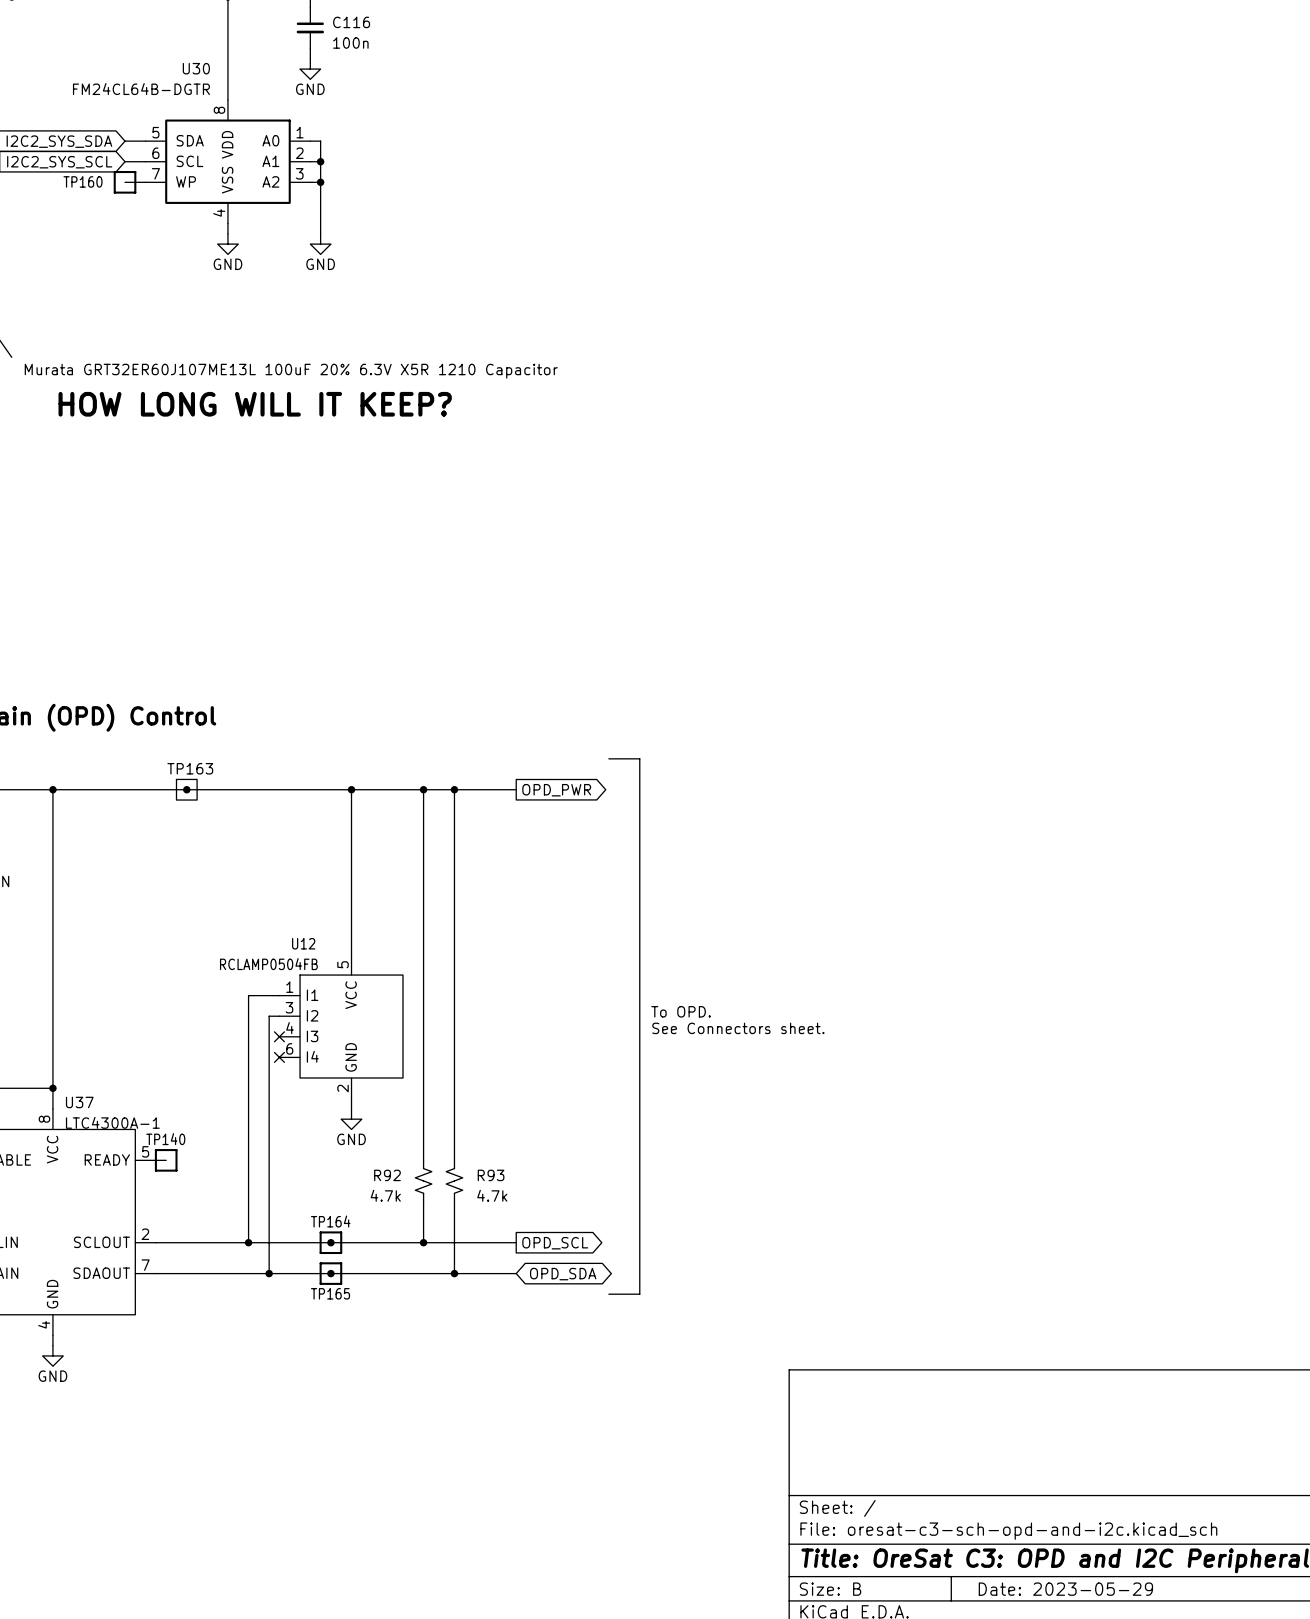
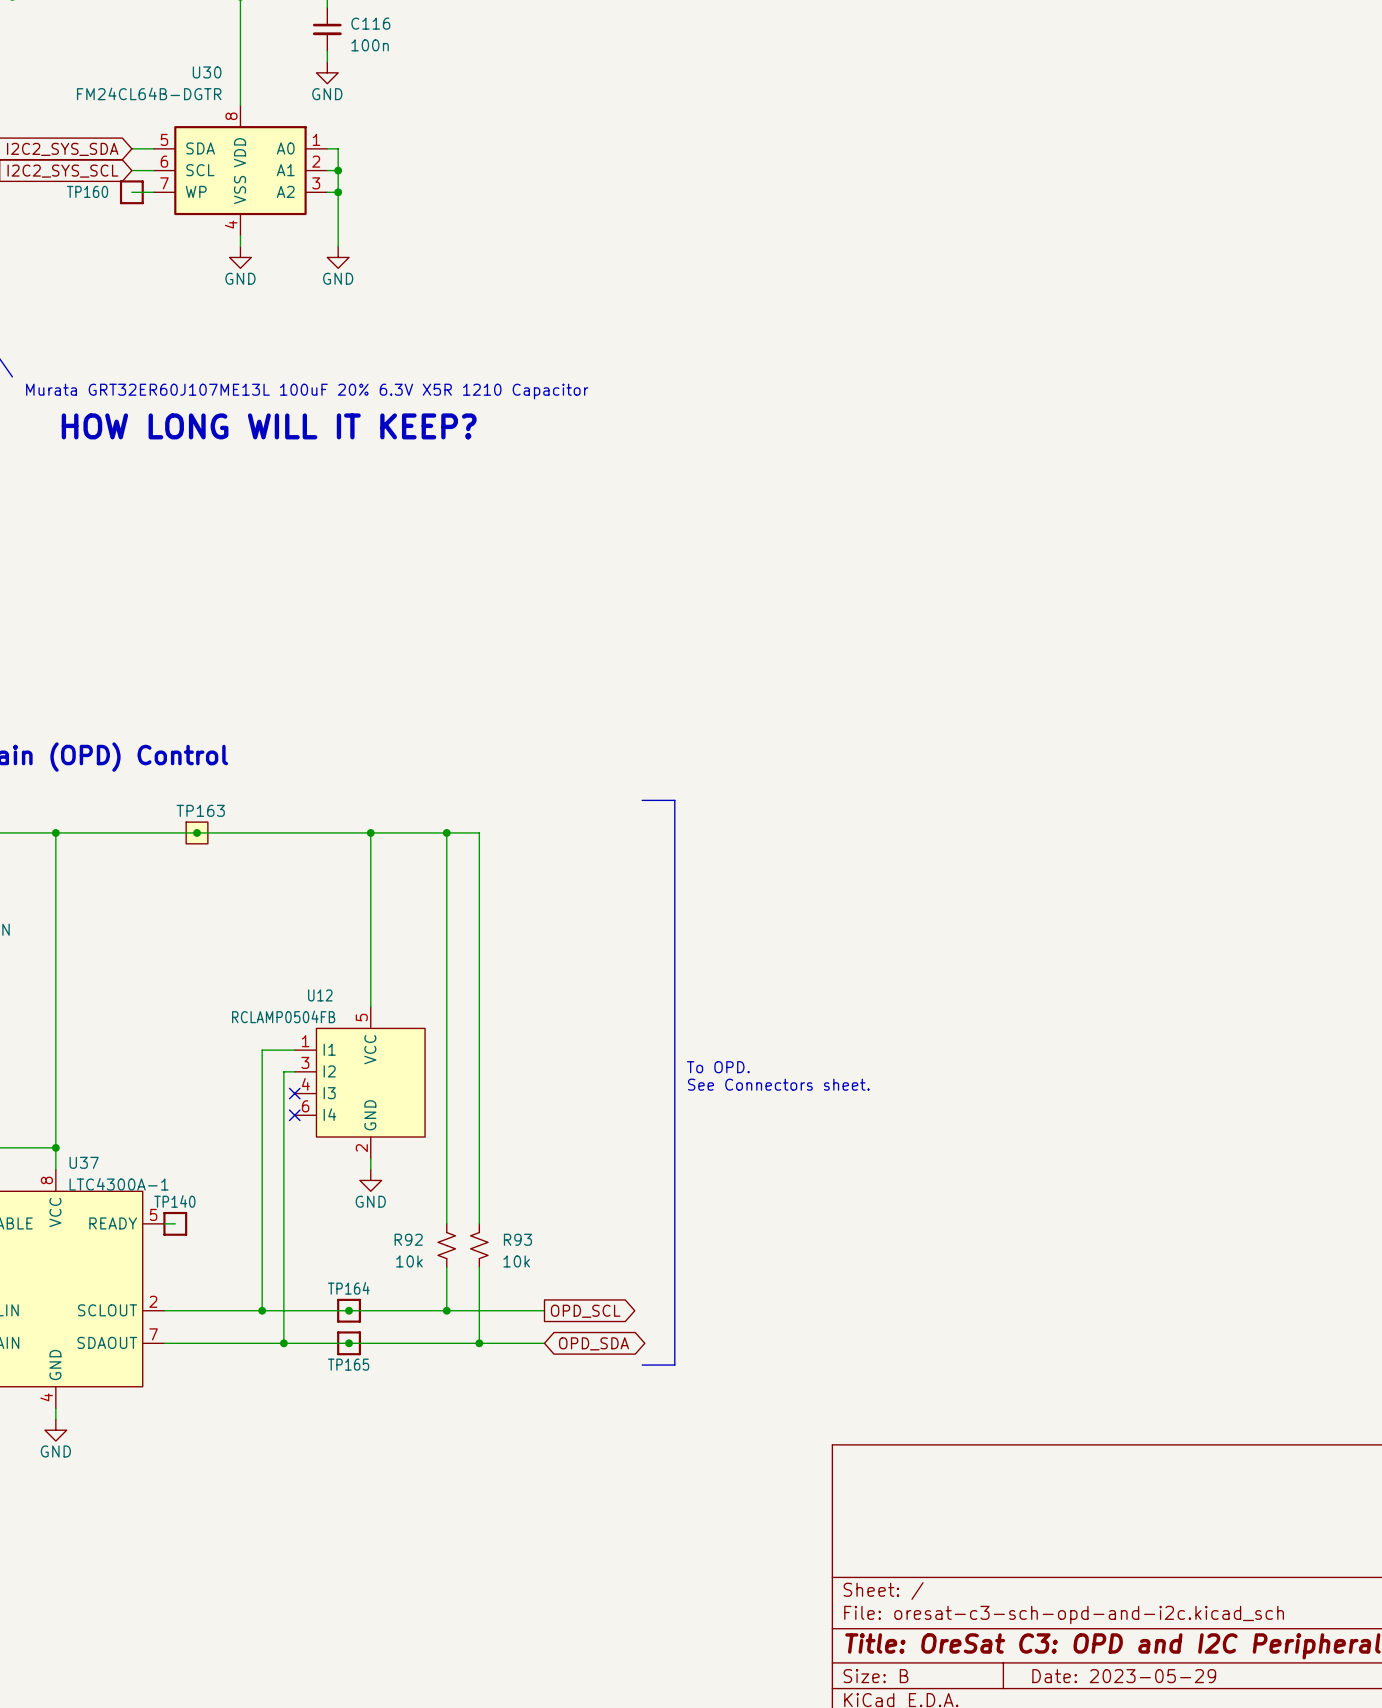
wire: (454, 789) (516, 789) -> none
junction: (454, 789) -> none
global label: OPD_PWR (556, 790) -> none
R92 value: 4.7k (385, 1195) -> 10k (409, 1261)
R93 value: 4.7k (492, 1195) -> 10k (516, 1261)

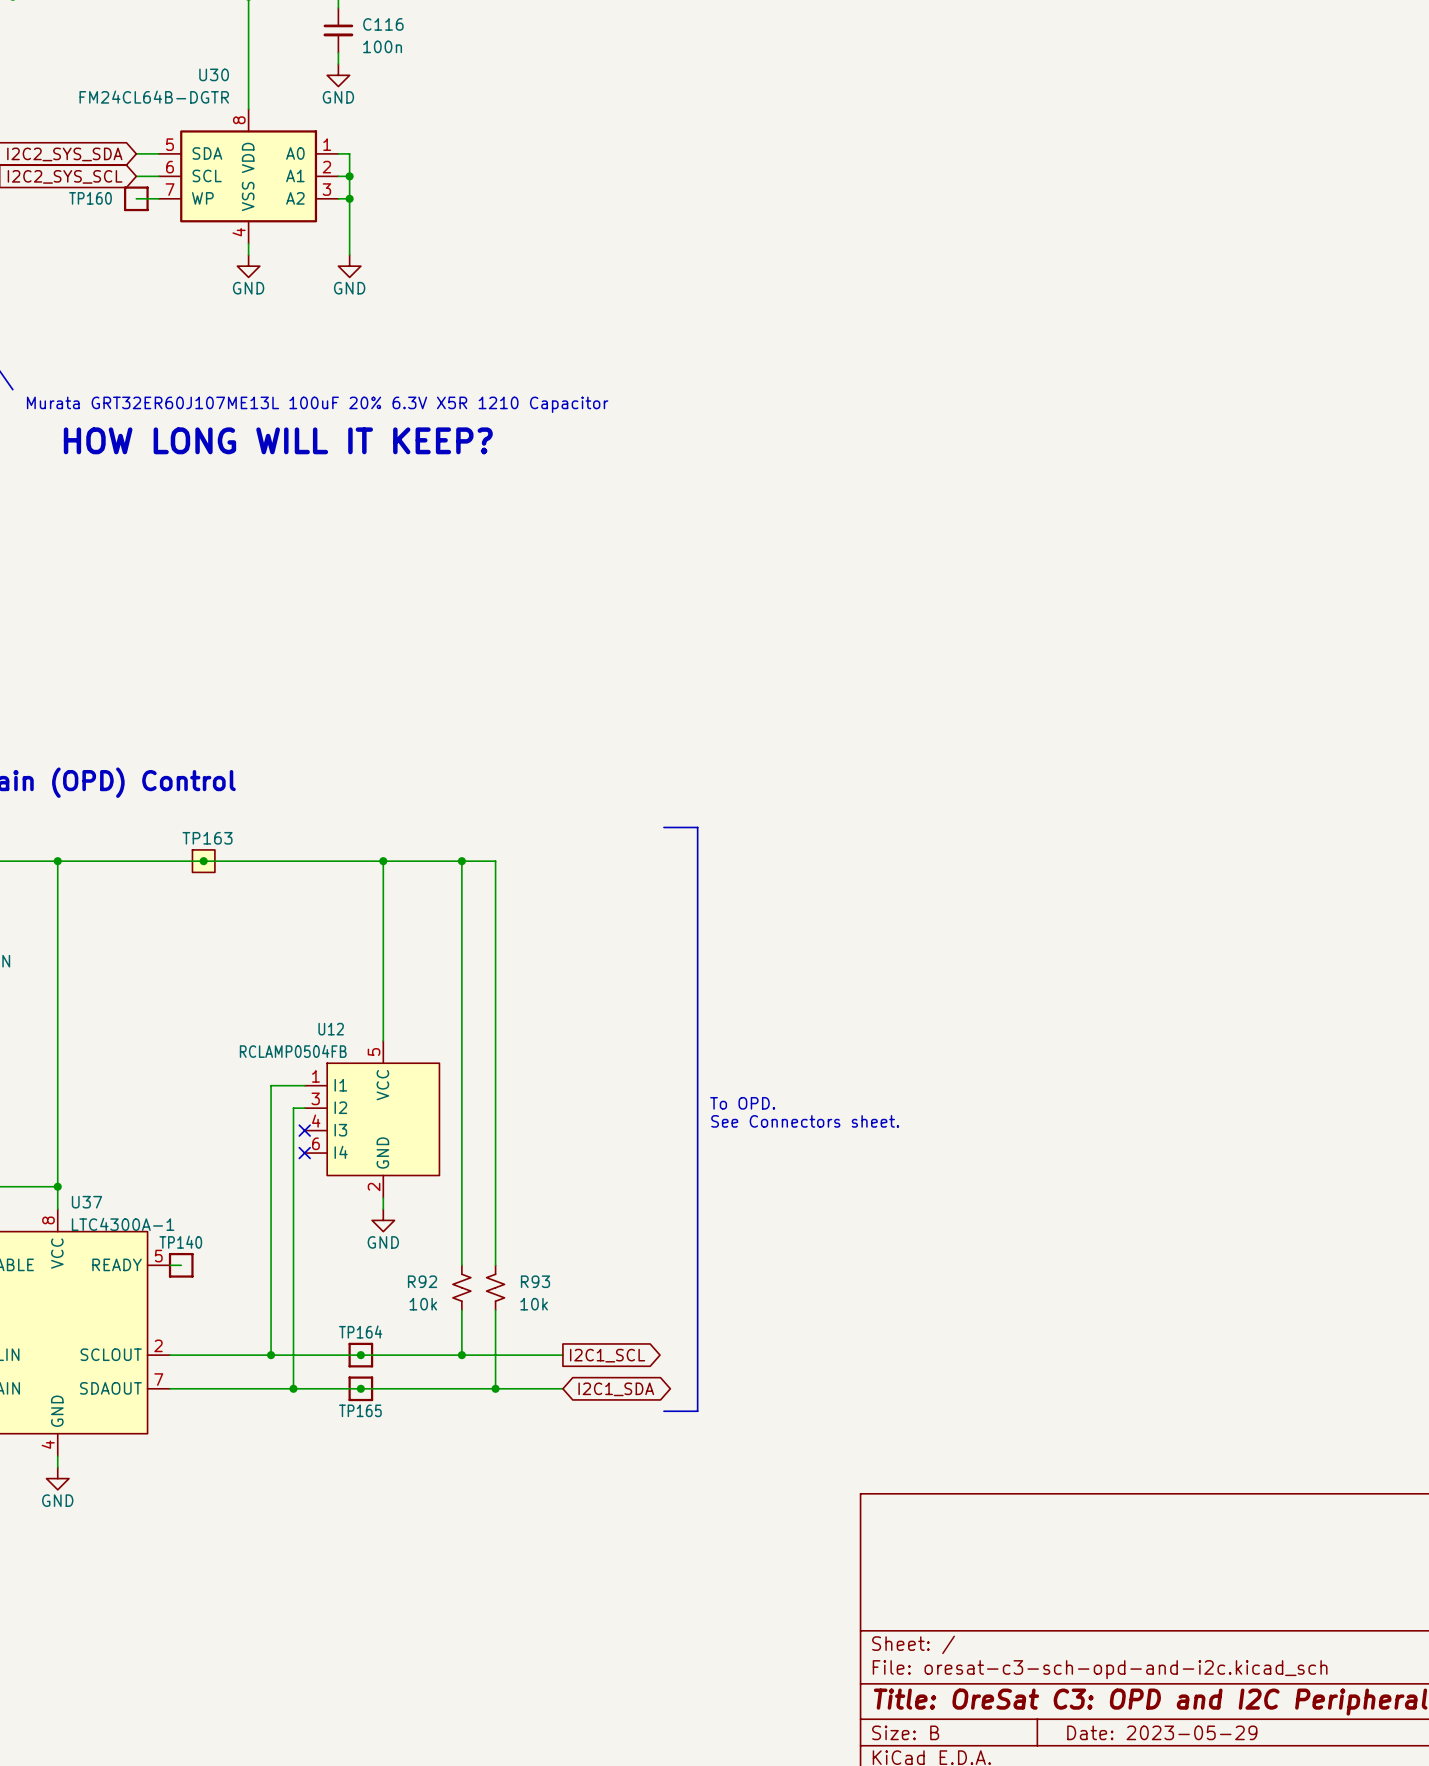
global label: OPD_SCL (585, 1311) -> I2C1_SCL (607, 1355)
global label: OPD_SDA (594, 1343) -> I2C1_SDA (616, 1389)

